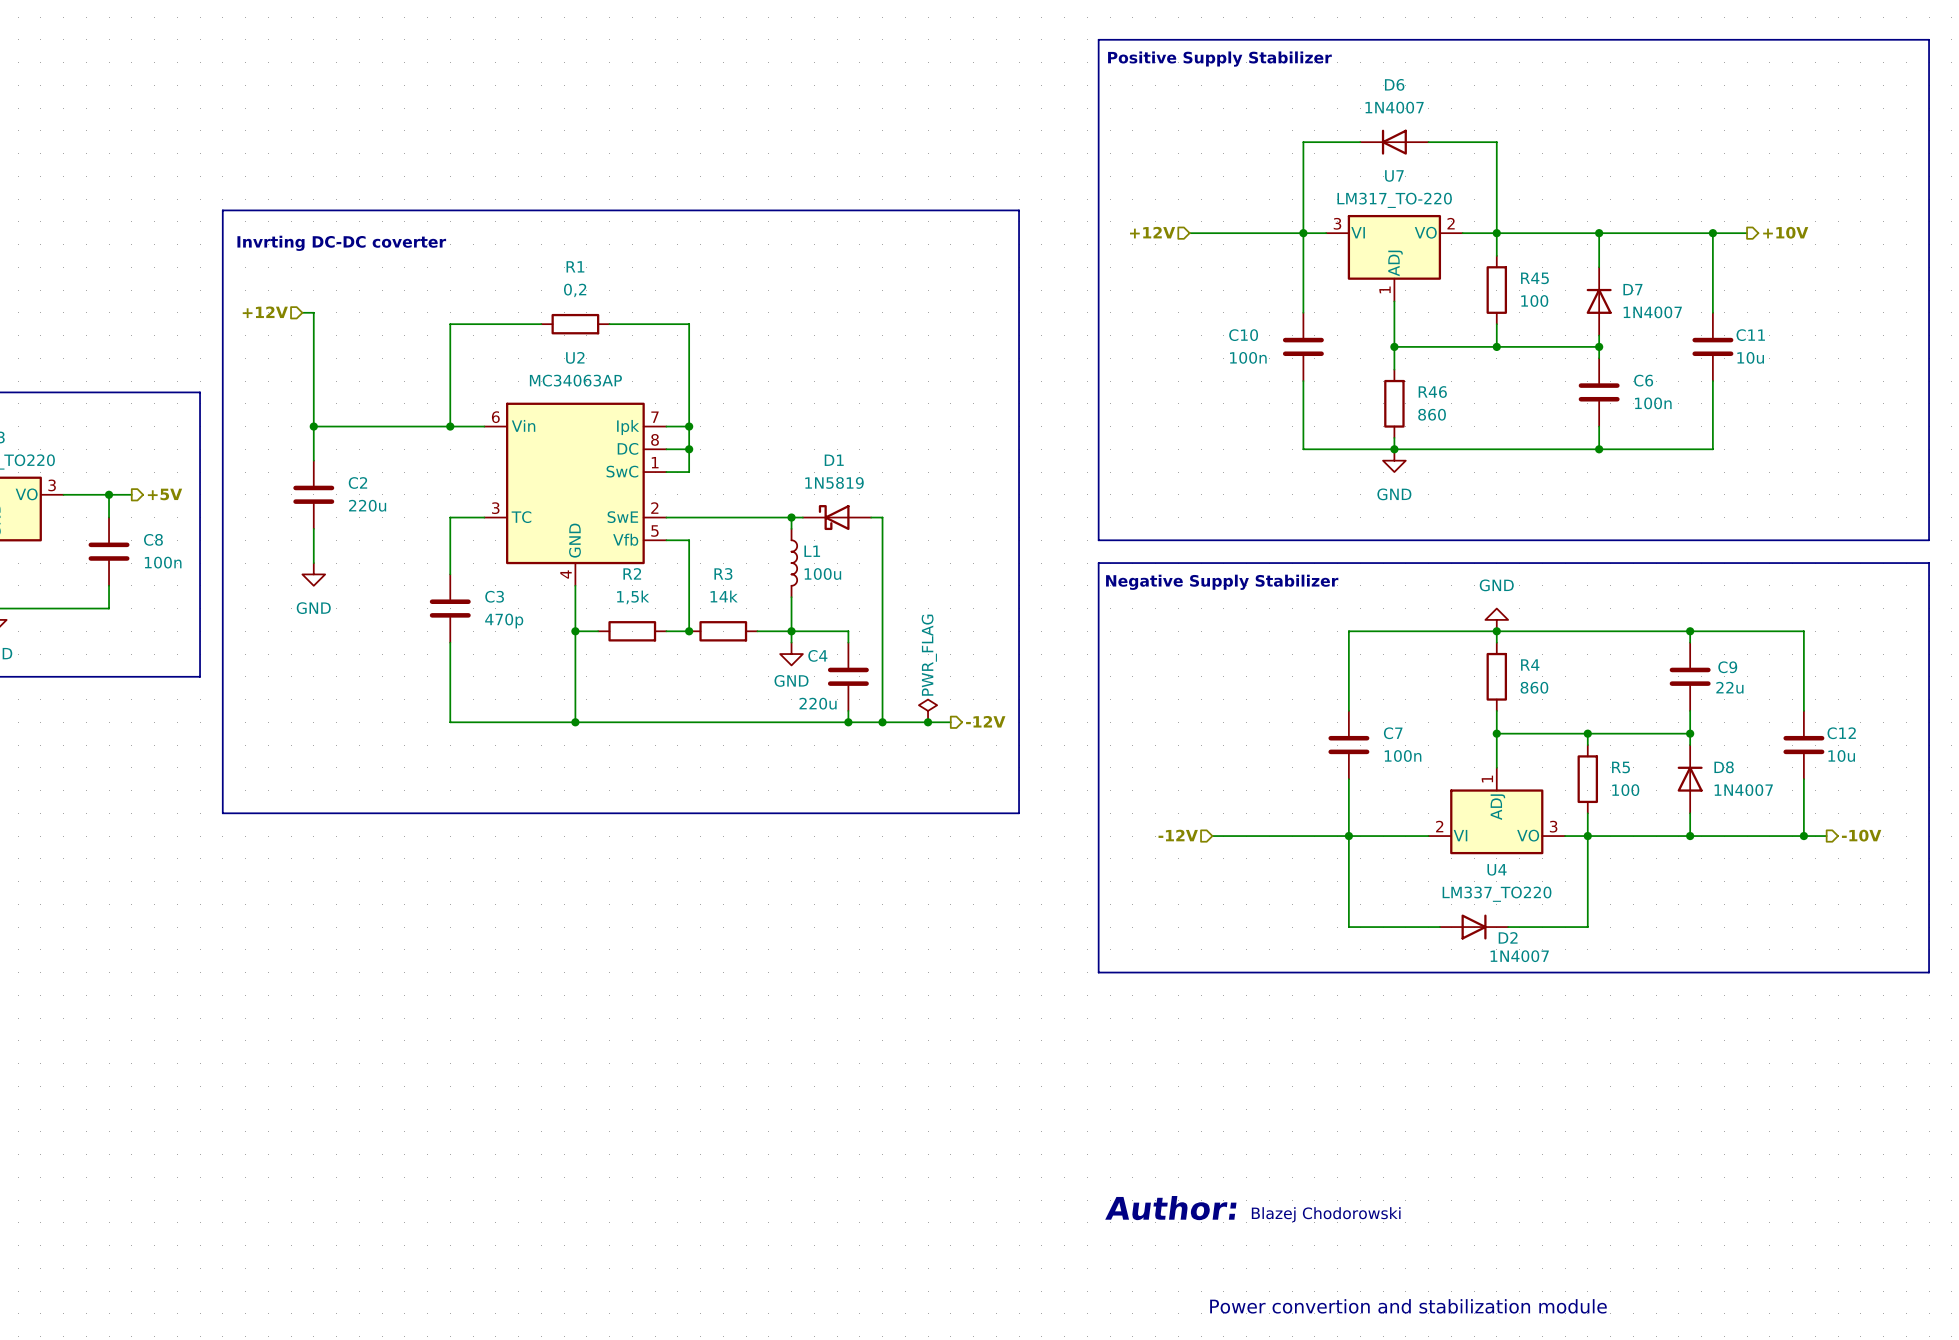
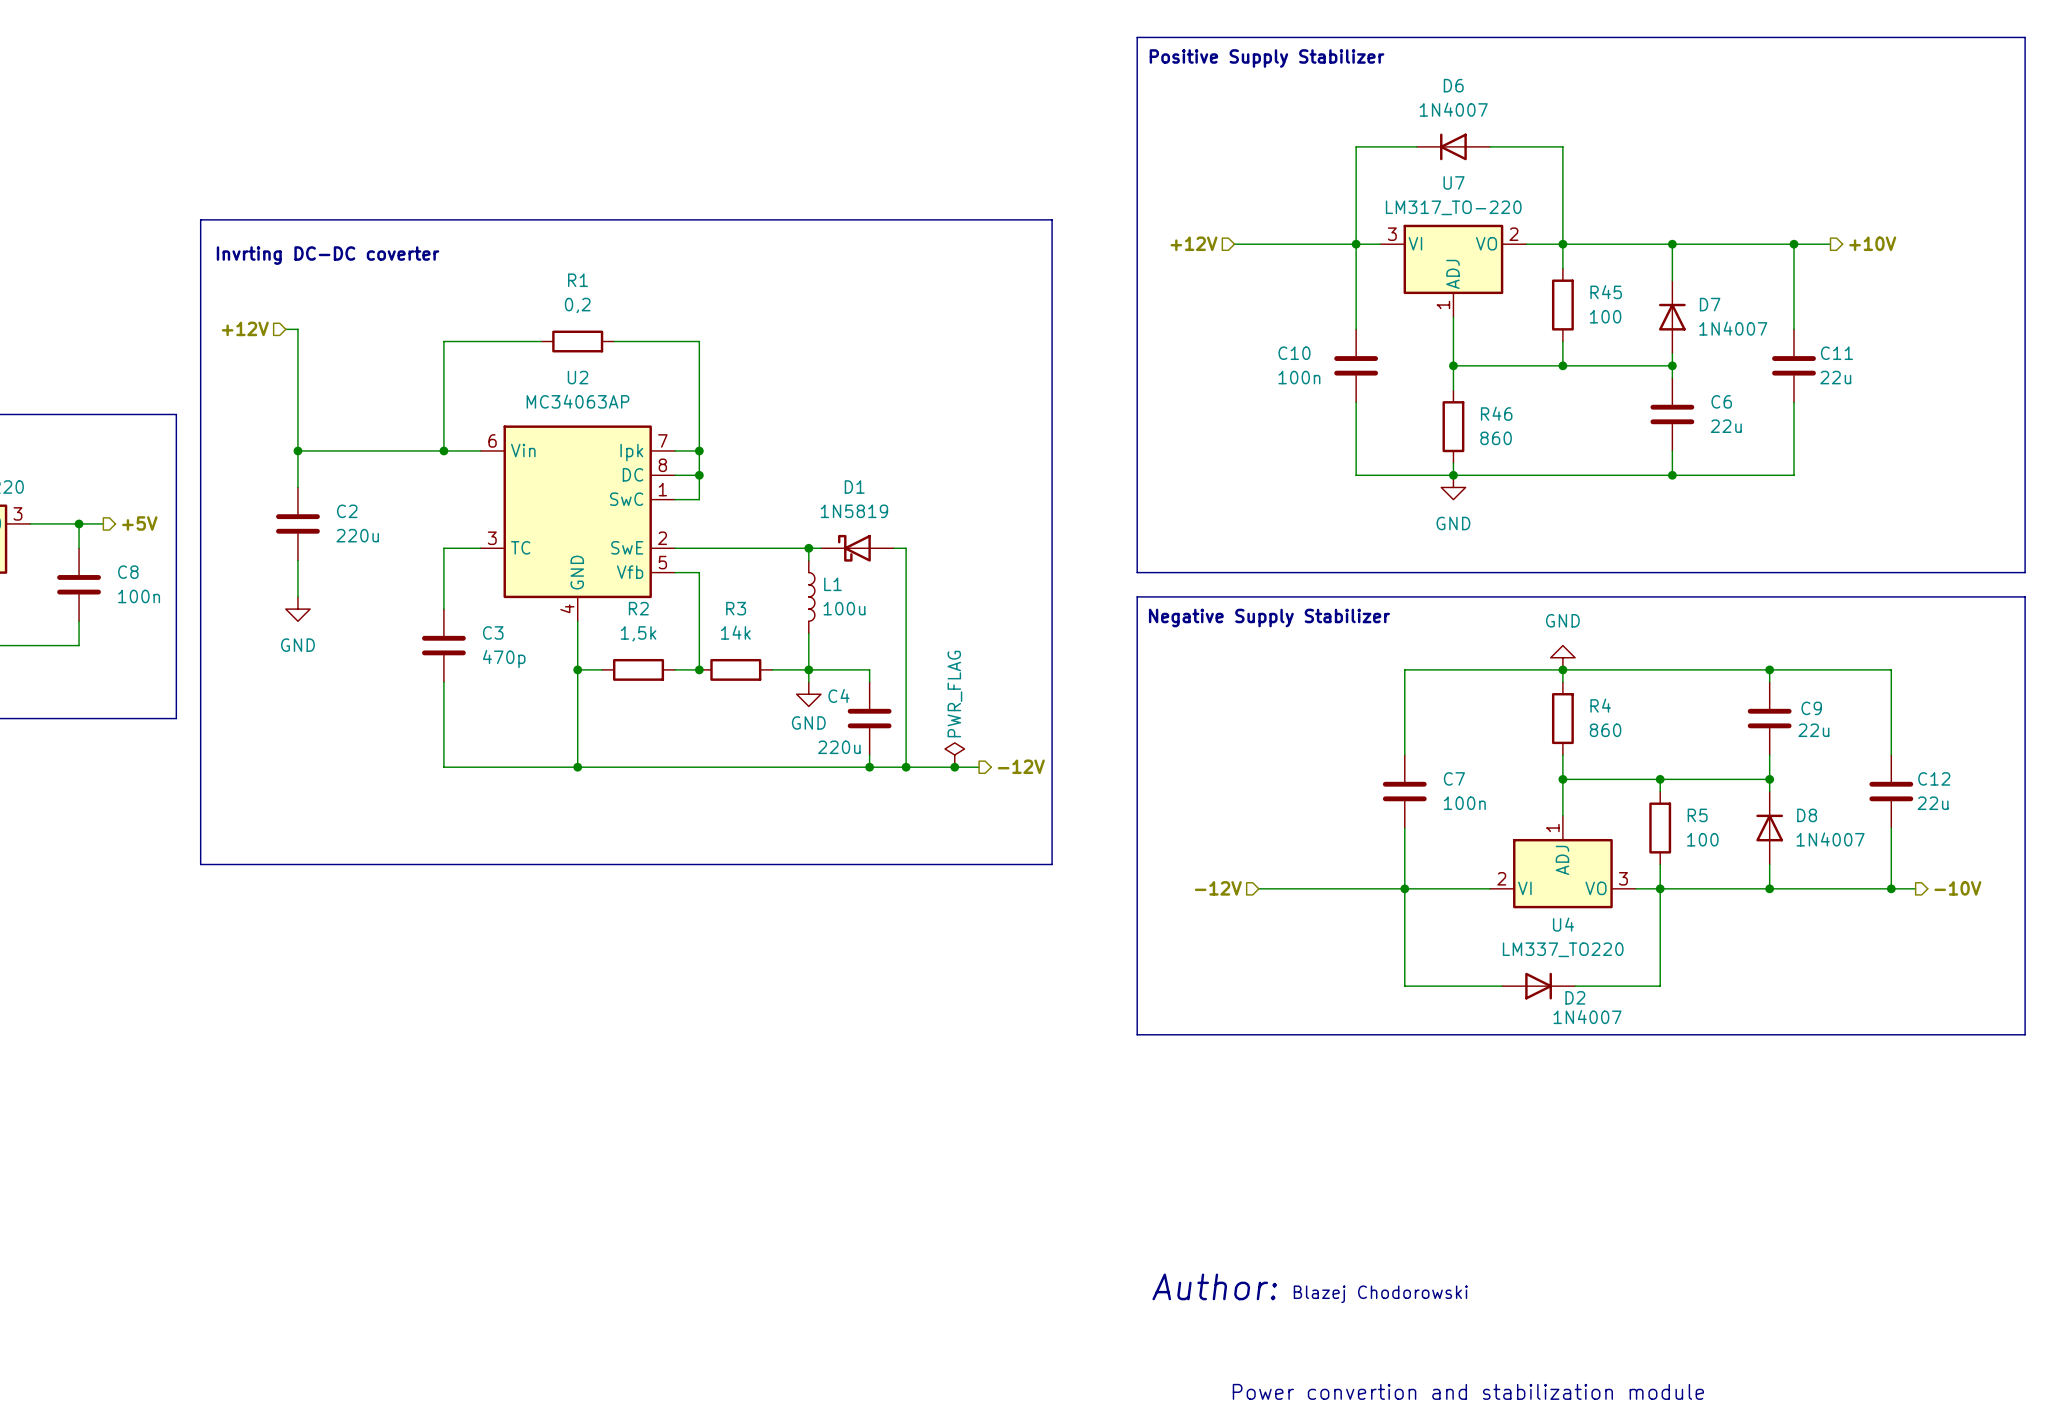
C11 value: 10u (1750, 357) -> 22u (1835, 377)
C6 value: 100n (1653, 403) -> 22u (1726, 426)
C12 value: 10u (1841, 756) -> 22u (1933, 803)

